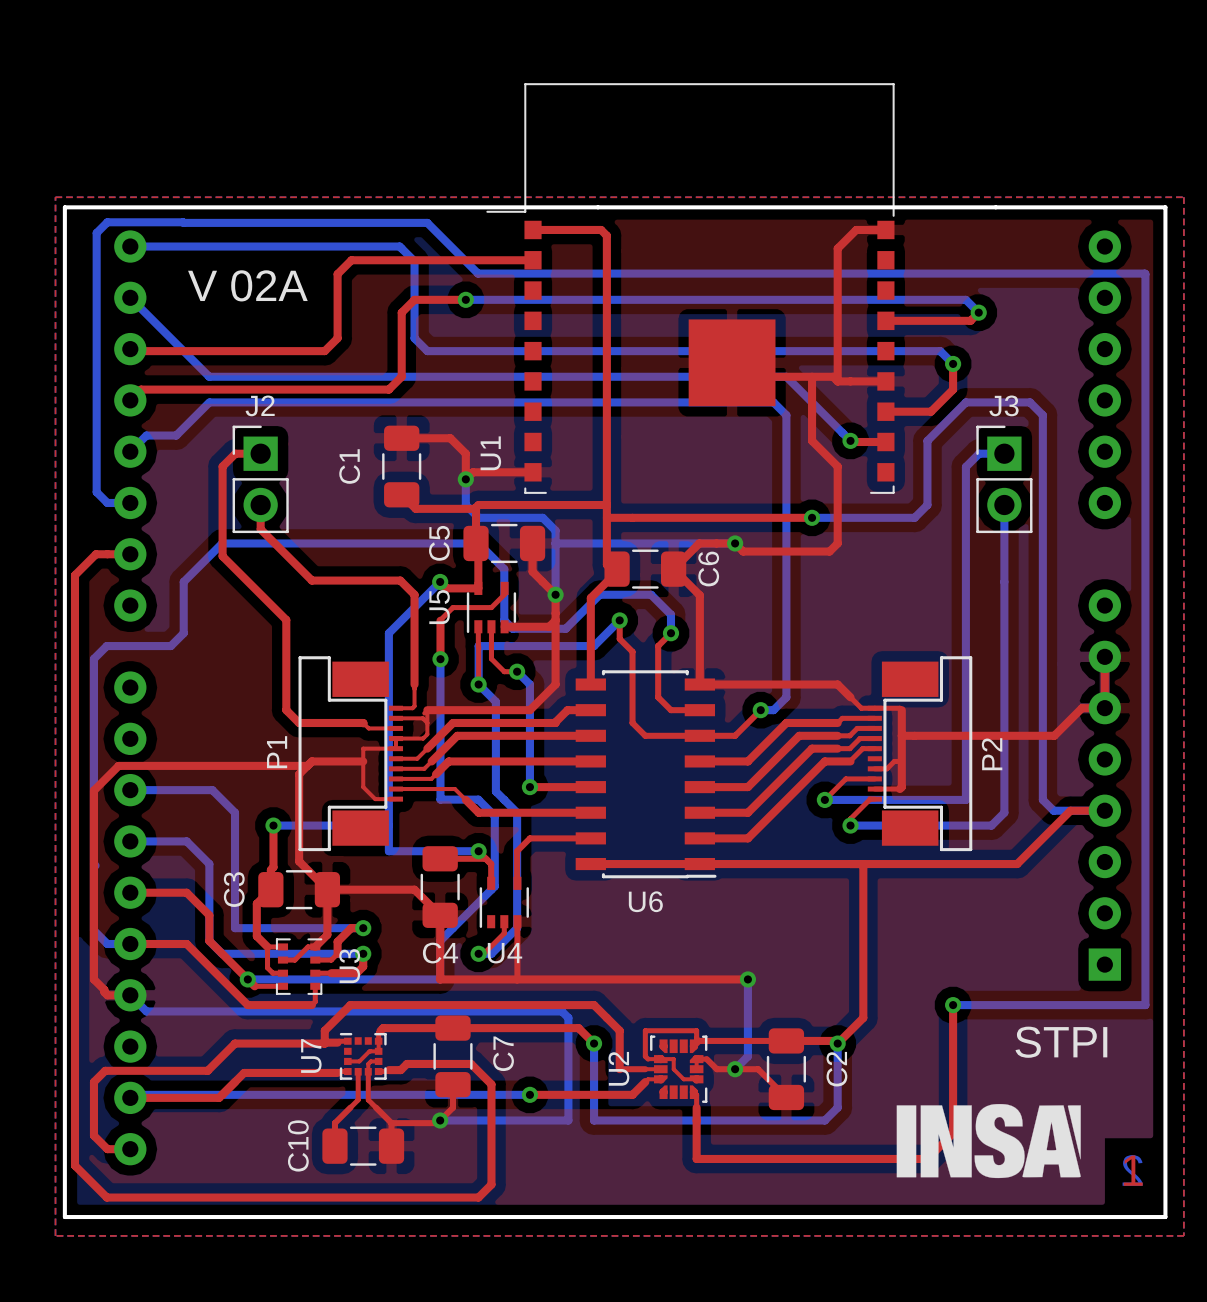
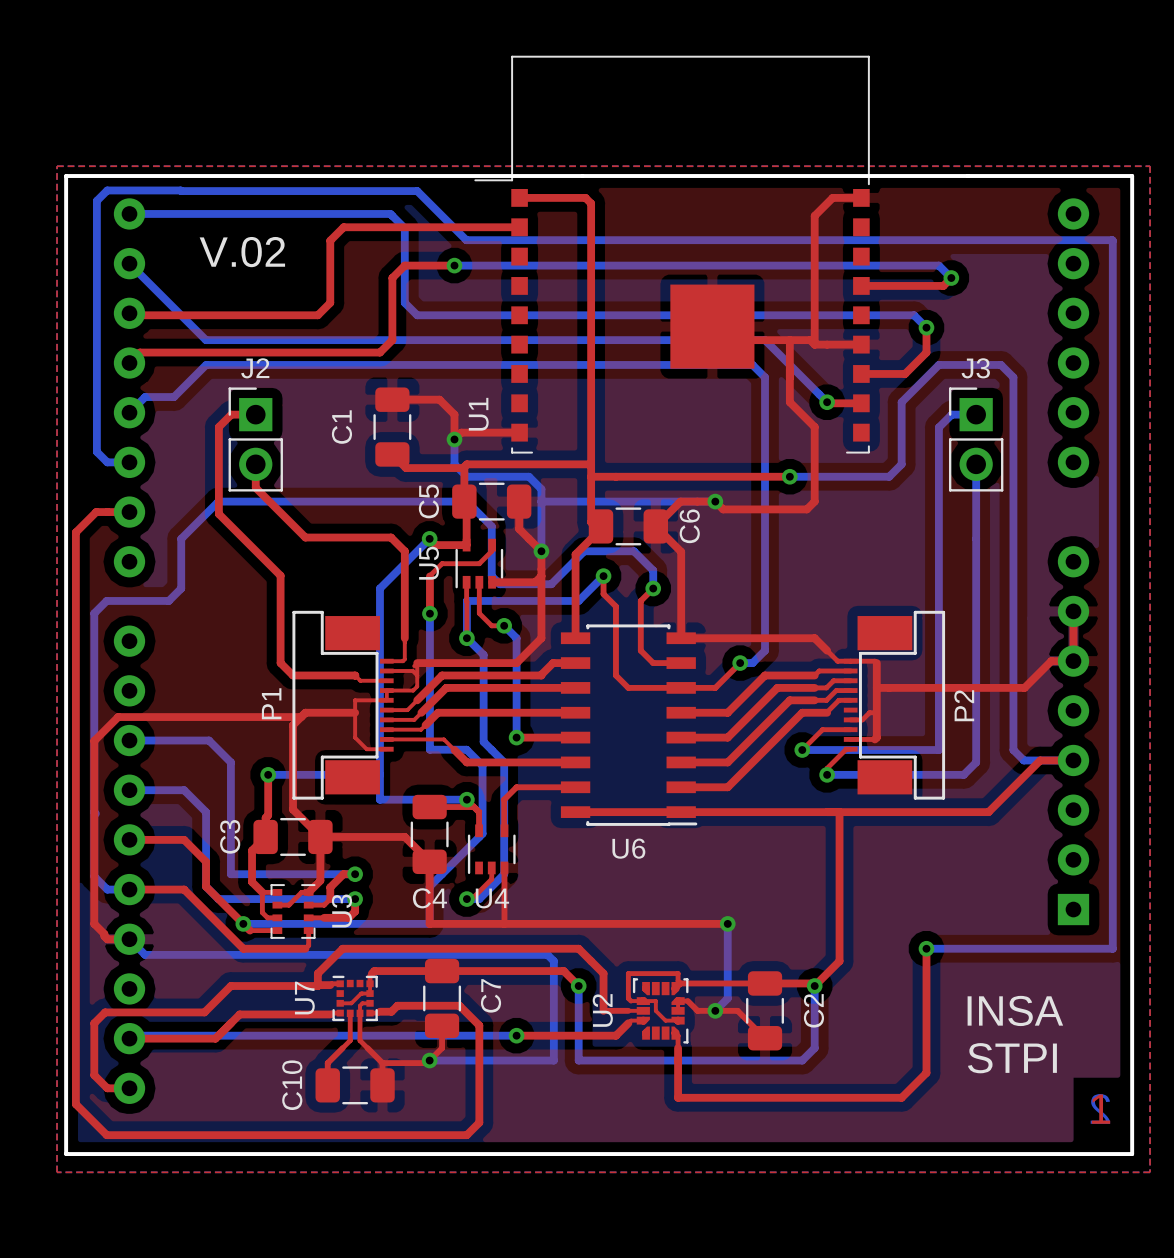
text: V 02A (247, 285) -> V.02 (242, 252)
text position: STPI (1061, 1042) -> STPI (1012, 1058)
text: none -> INSA (1015, 1010)
drawing: [896, 1103, 1081, 1179] -> none

